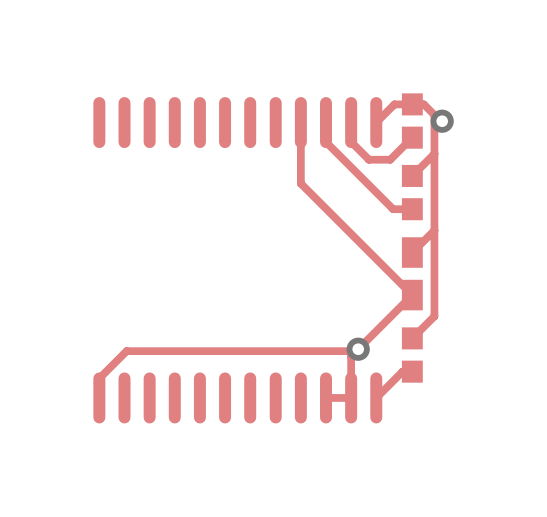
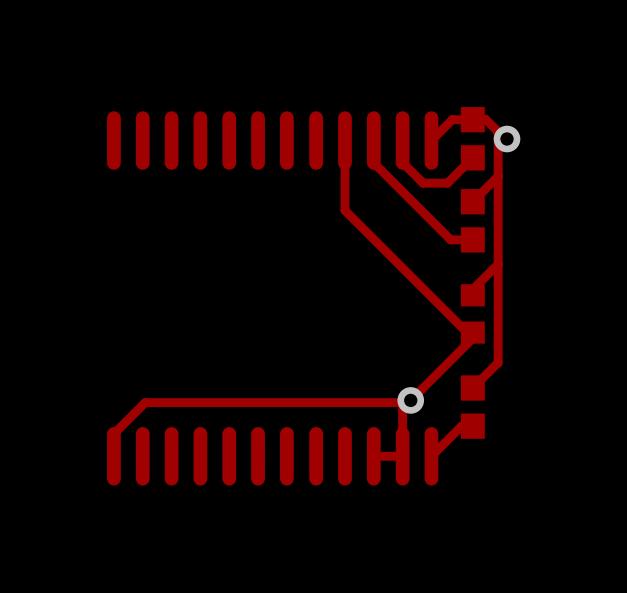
part footprint: [401, 237, 423, 311] -> [460, 284, 485, 344]

